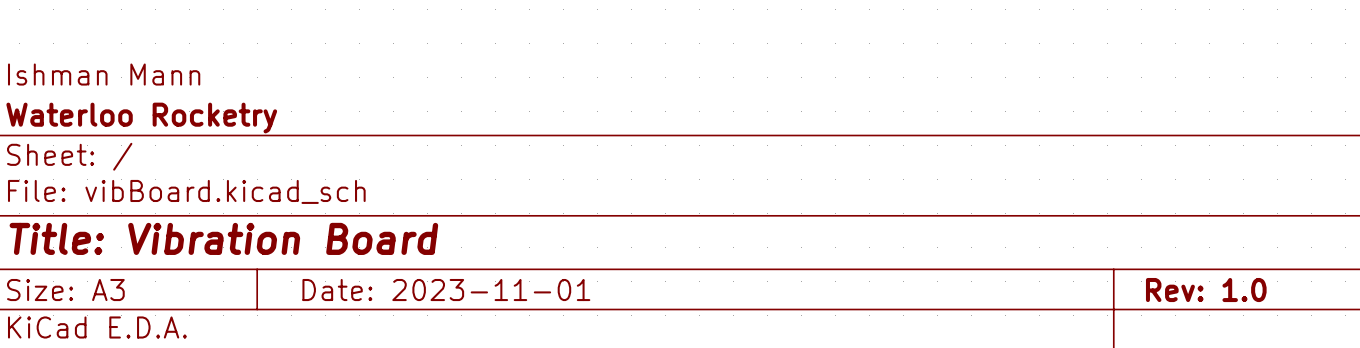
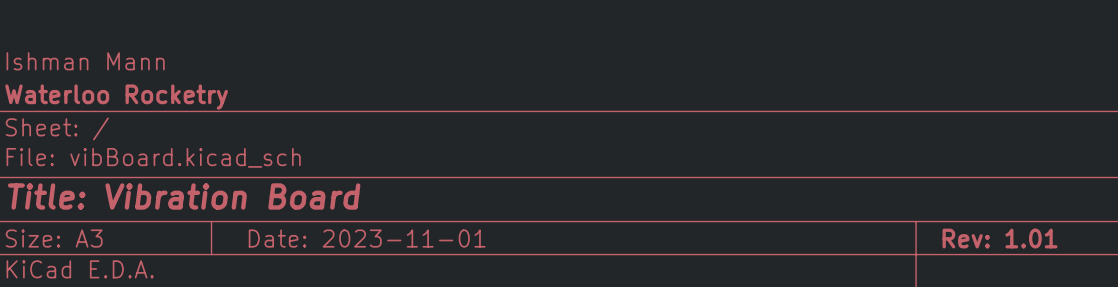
title block: Rev: 1.0 (1206, 290) -> Rev: 1.01 (1000, 238)

